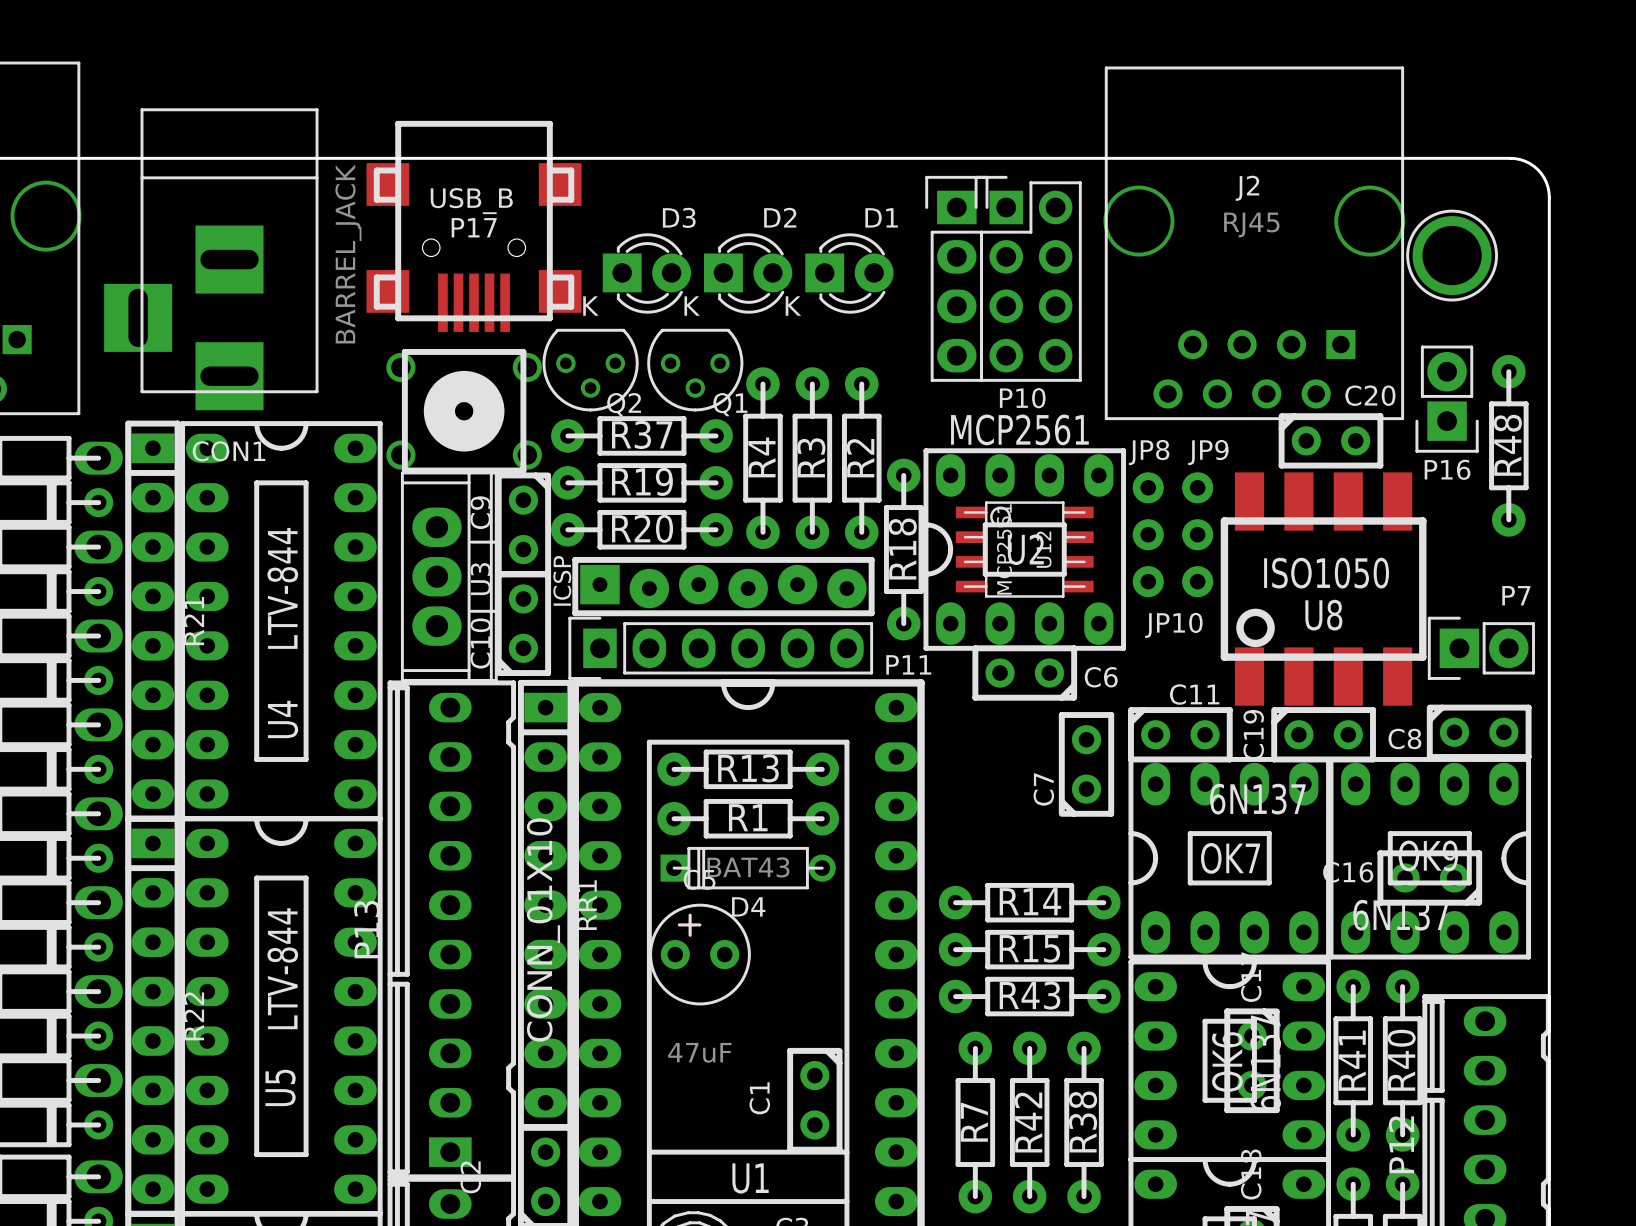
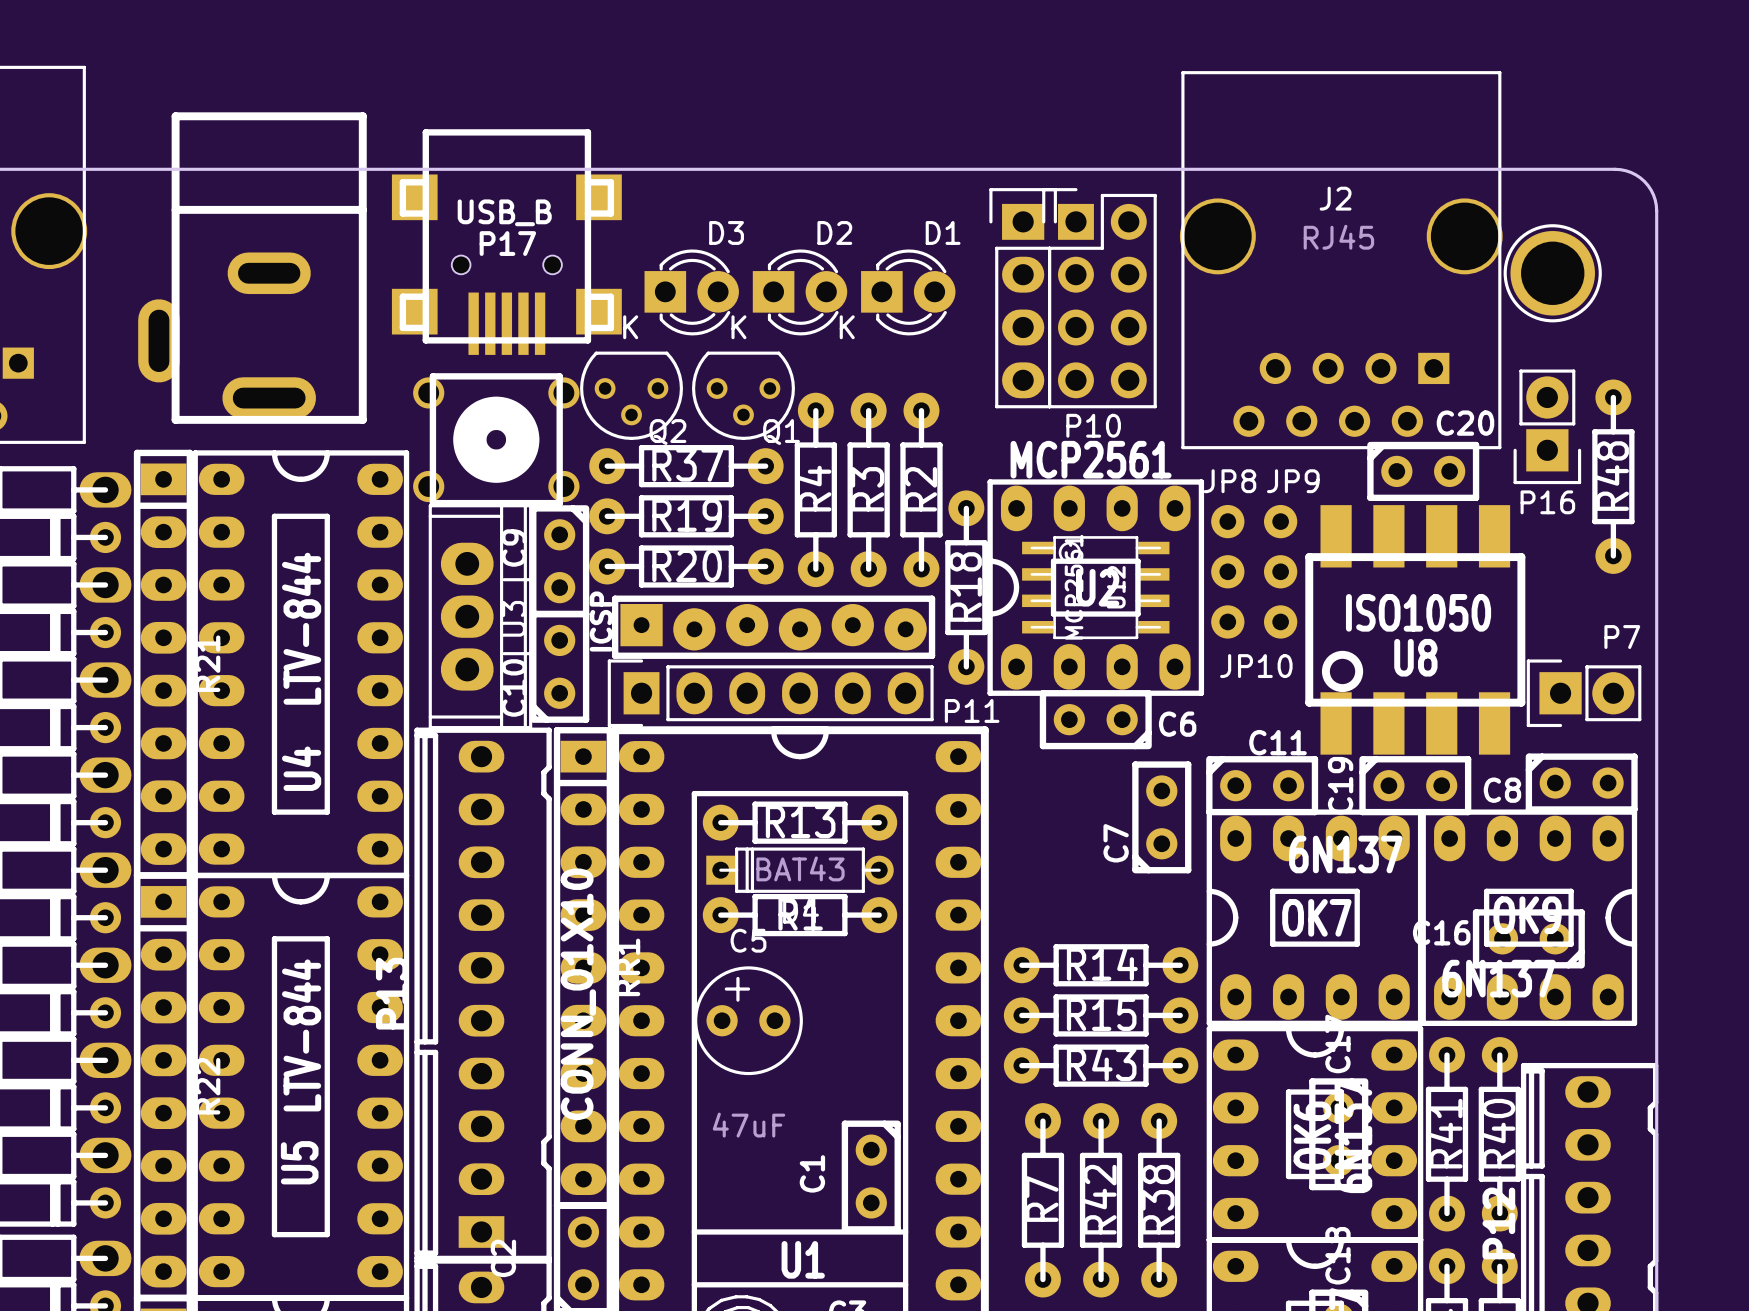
part: none -> (252, 268)
CON1: BARREL_JACK (211, 259) -> none
R1 position: (748, 818) -> (800, 915)
D4 position: (748, 868) -> (800, 870)

